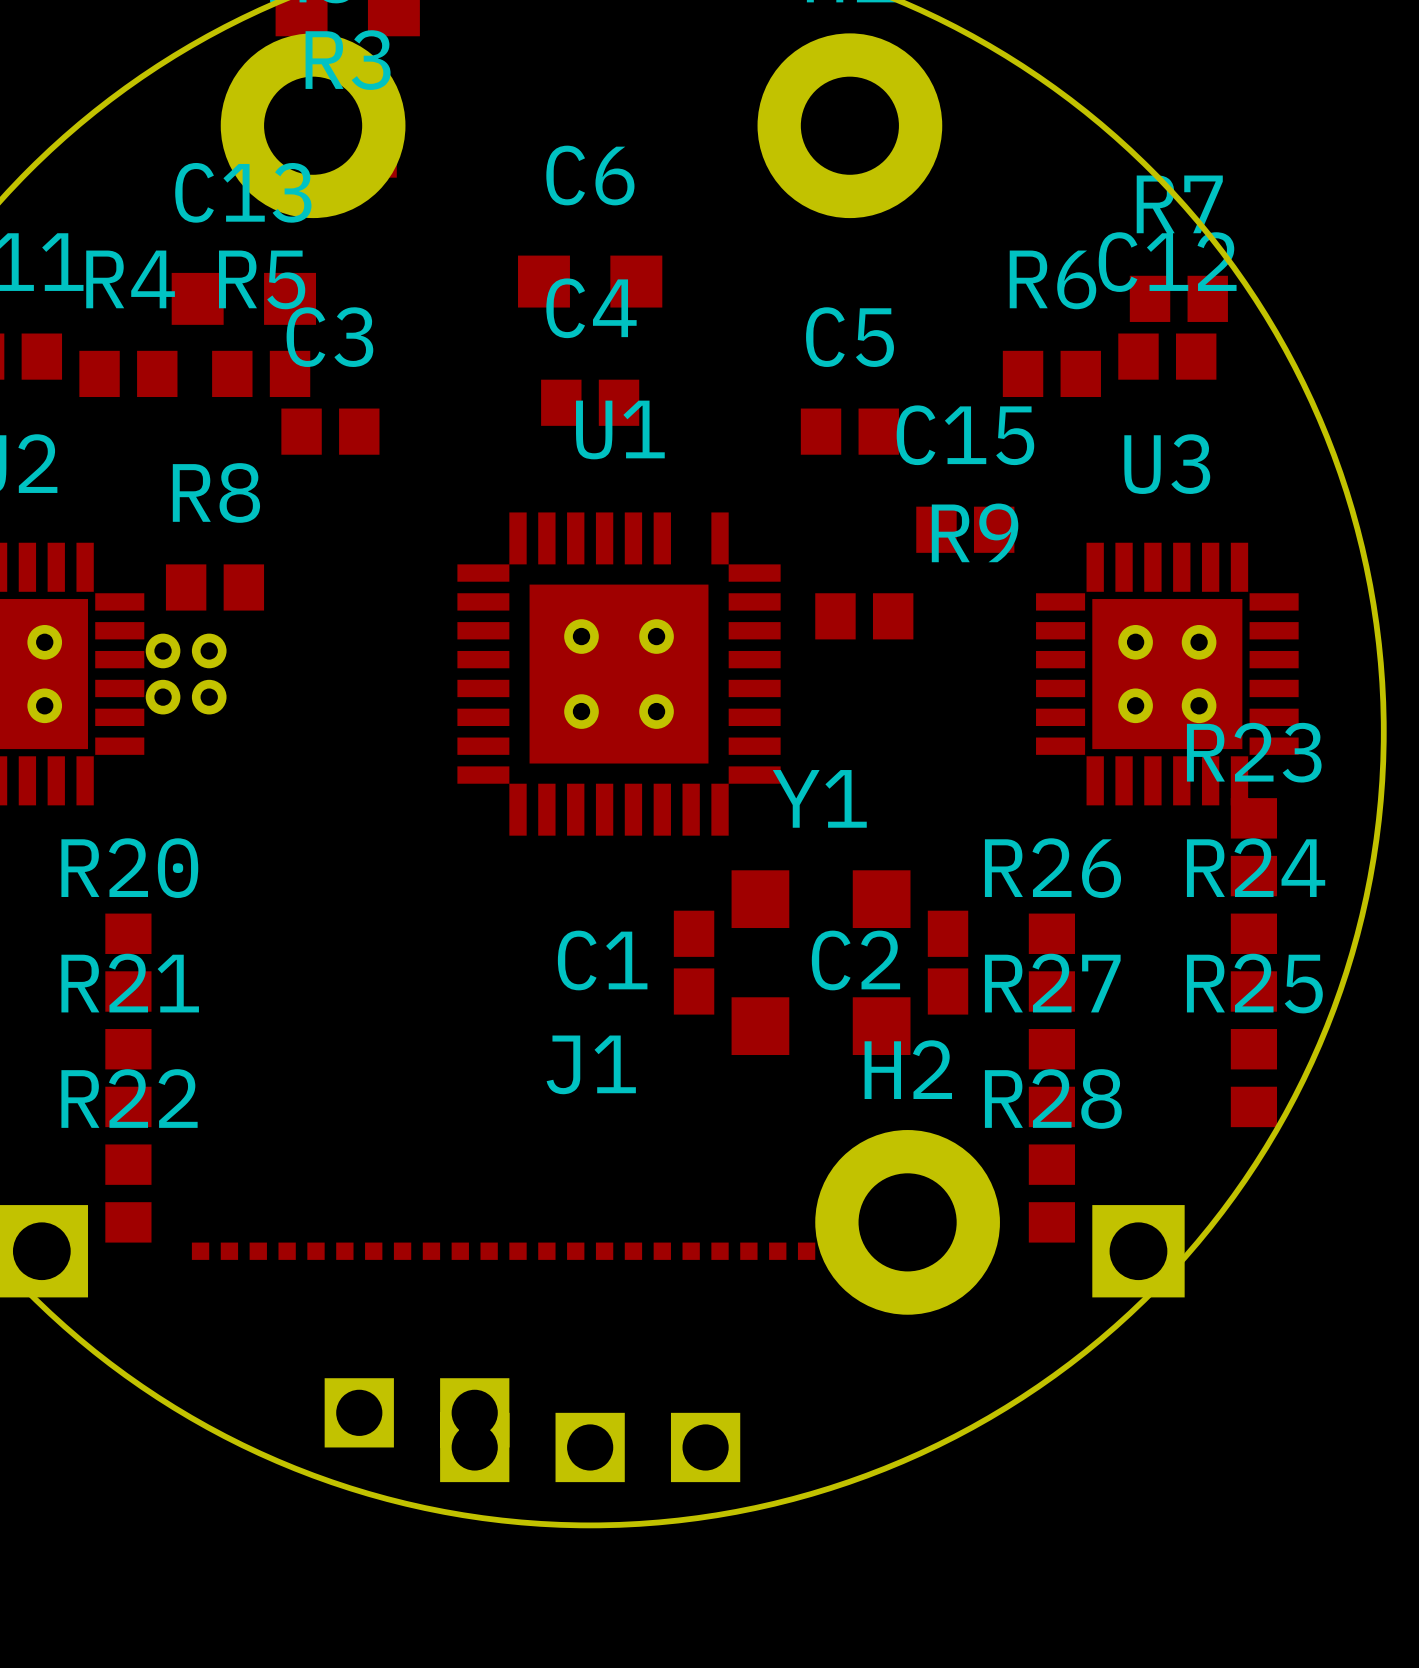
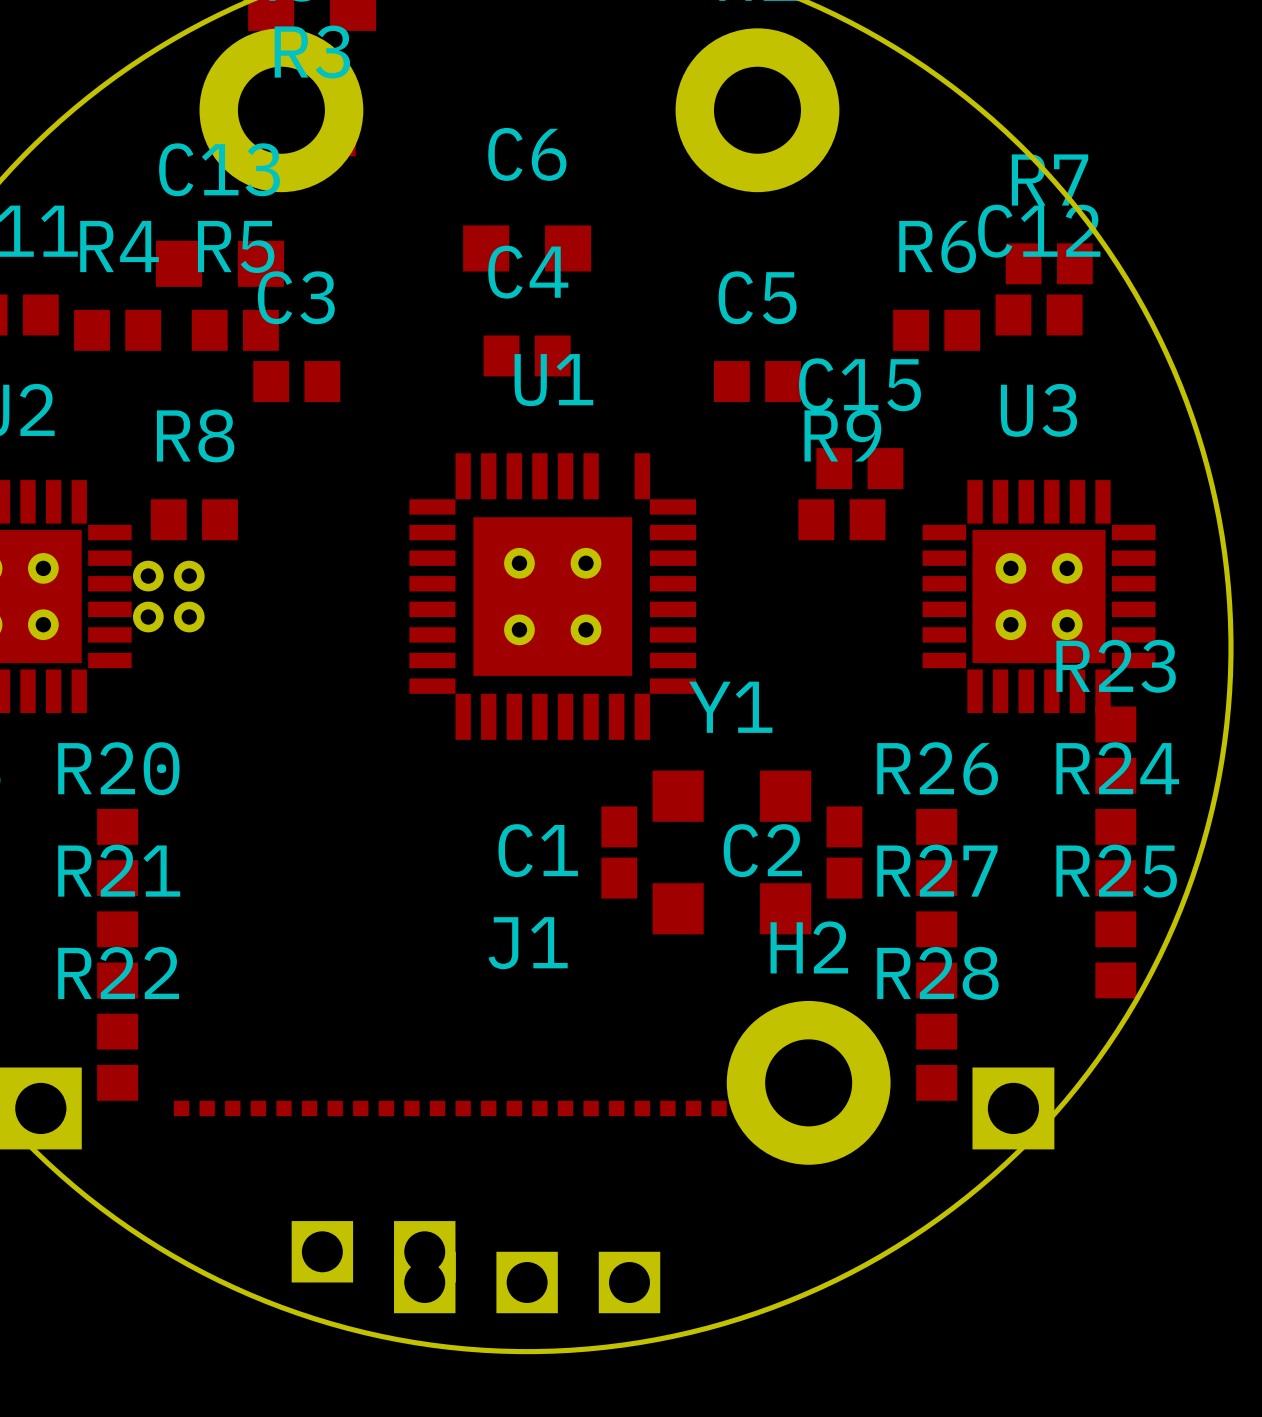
R9 name position: R9 (975, 532) -> R9 (842, 435)
R9 position: (864, 616) -> (841, 519)

